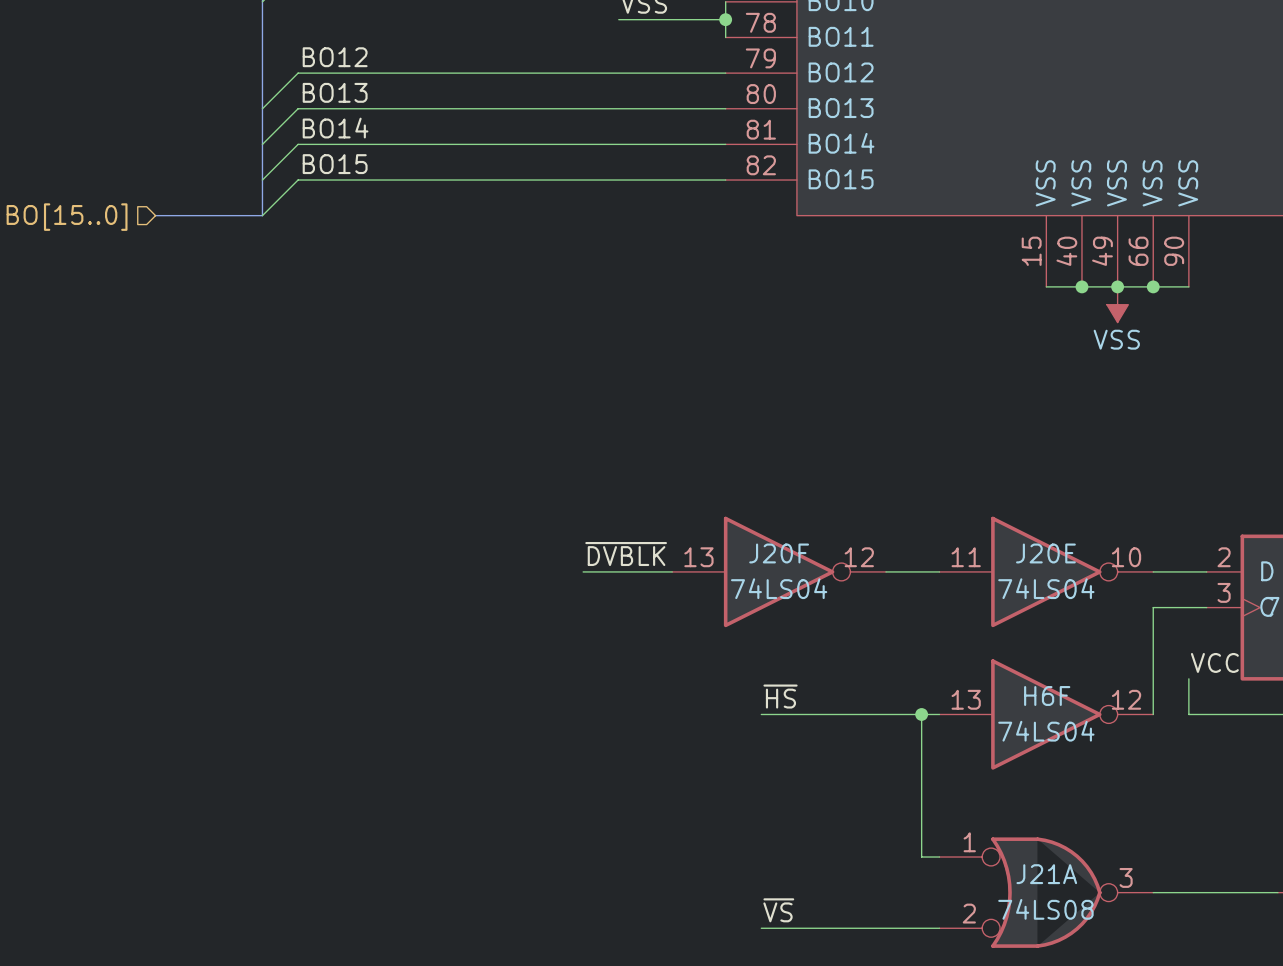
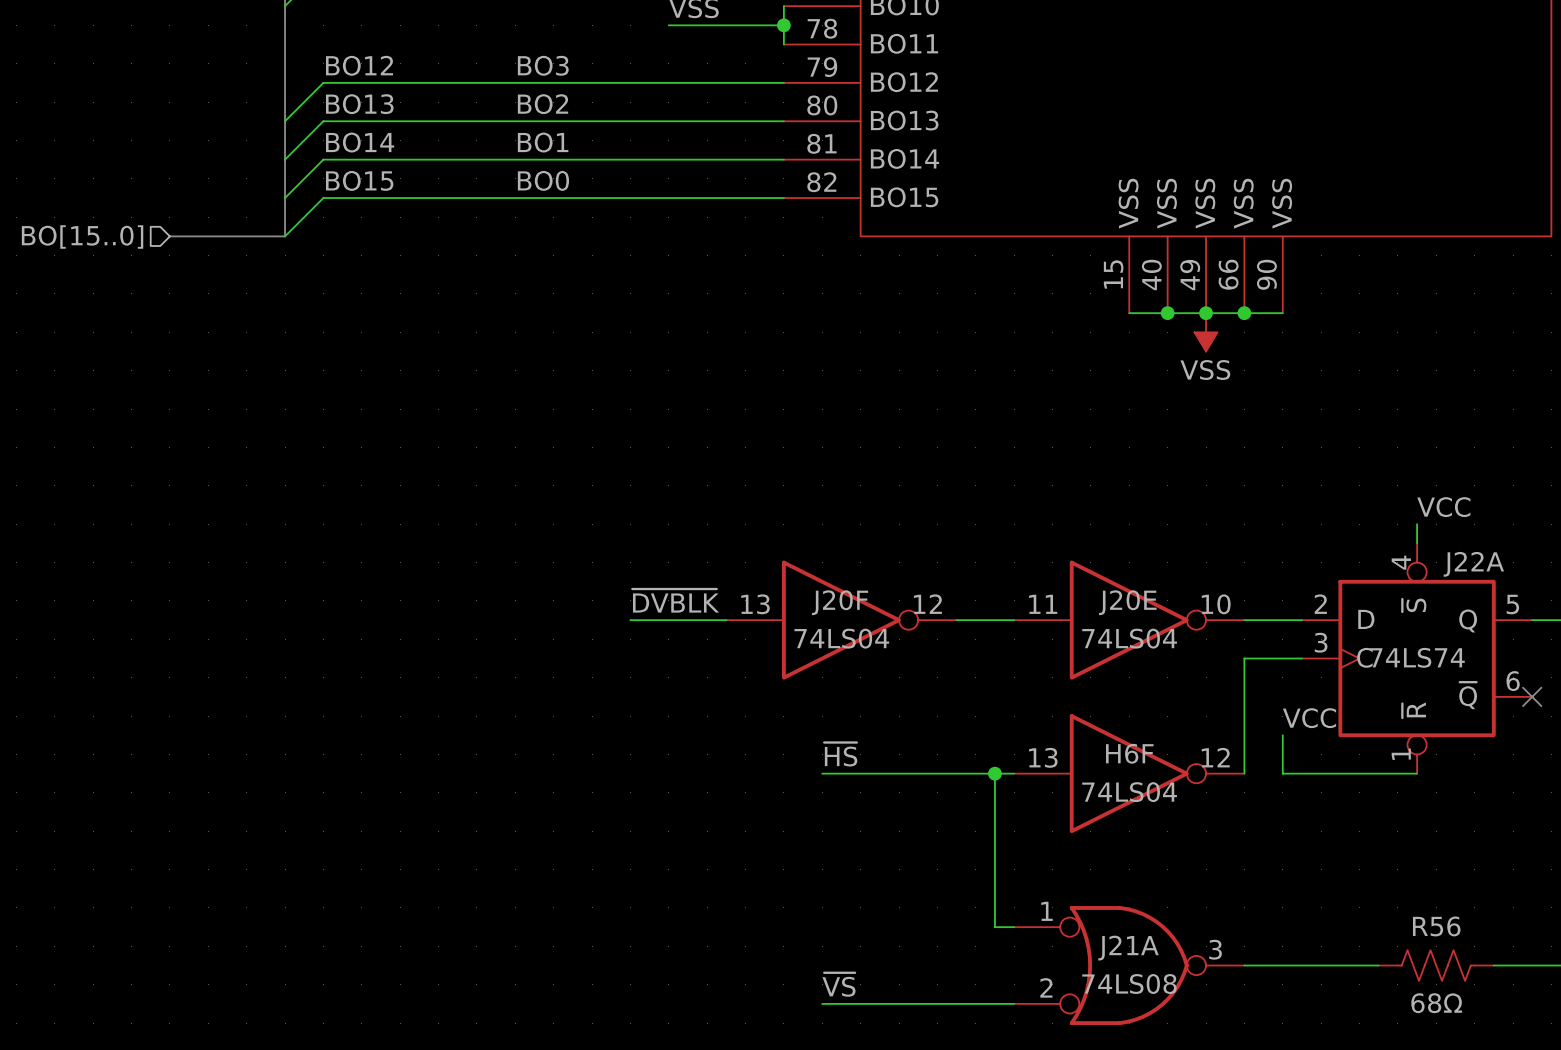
label: none -> BO3 (543, 65)
label: none -> BO2 (543, 104)
label: none -> BO1 (543, 142)
label: none -> BO0 (543, 180)

